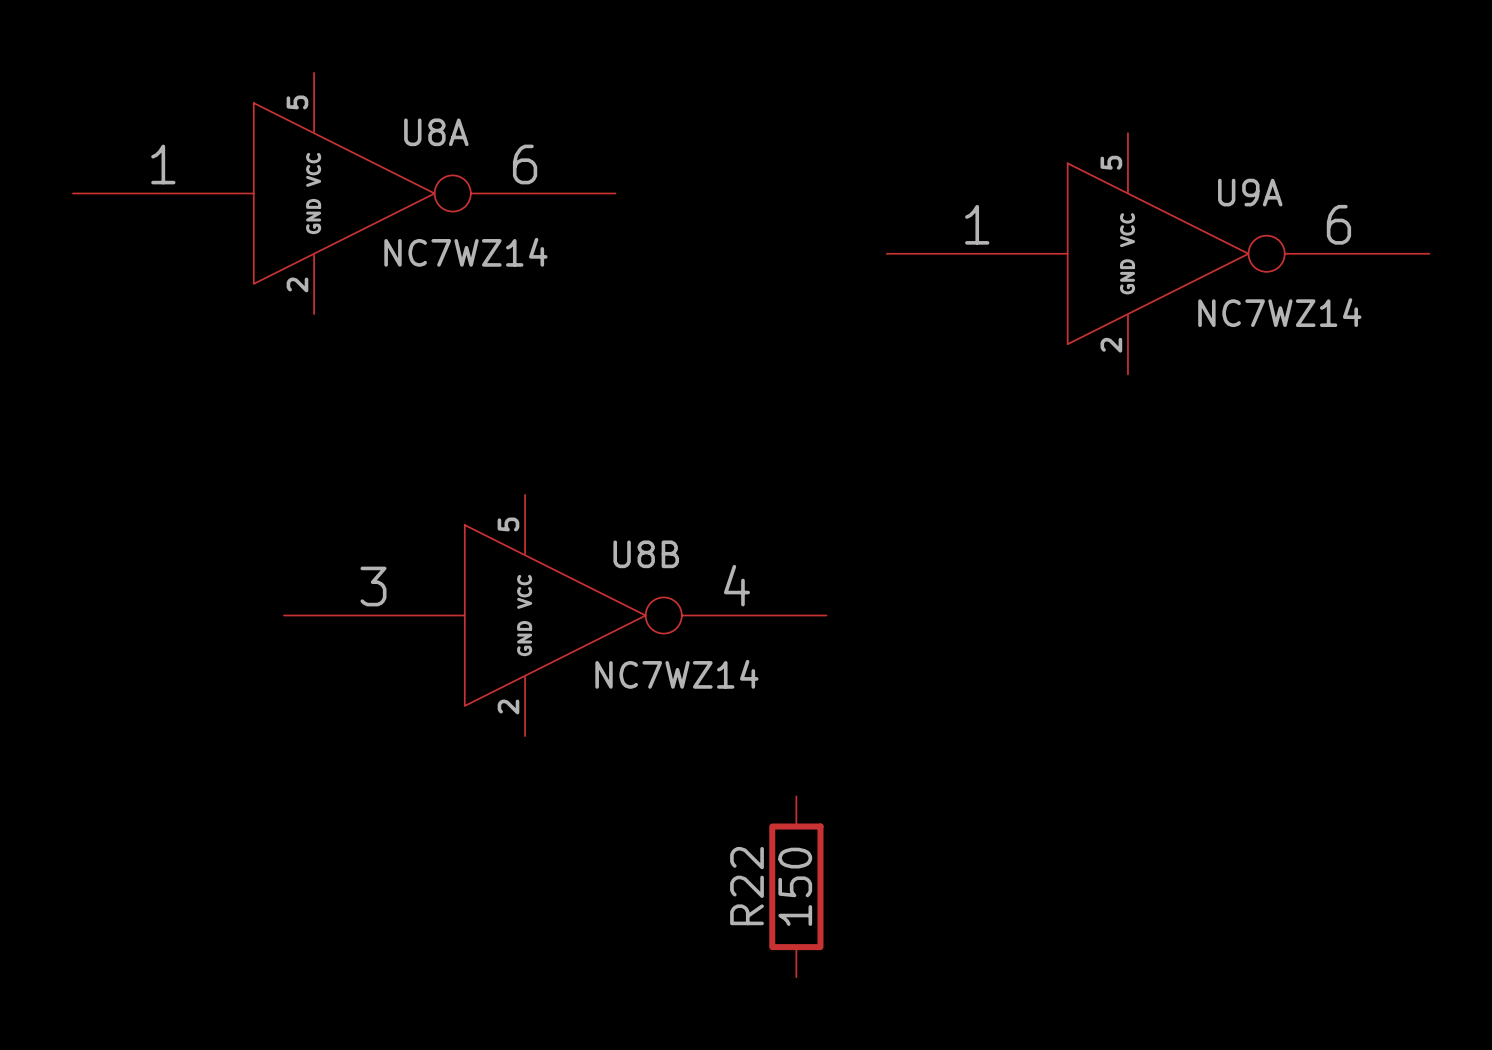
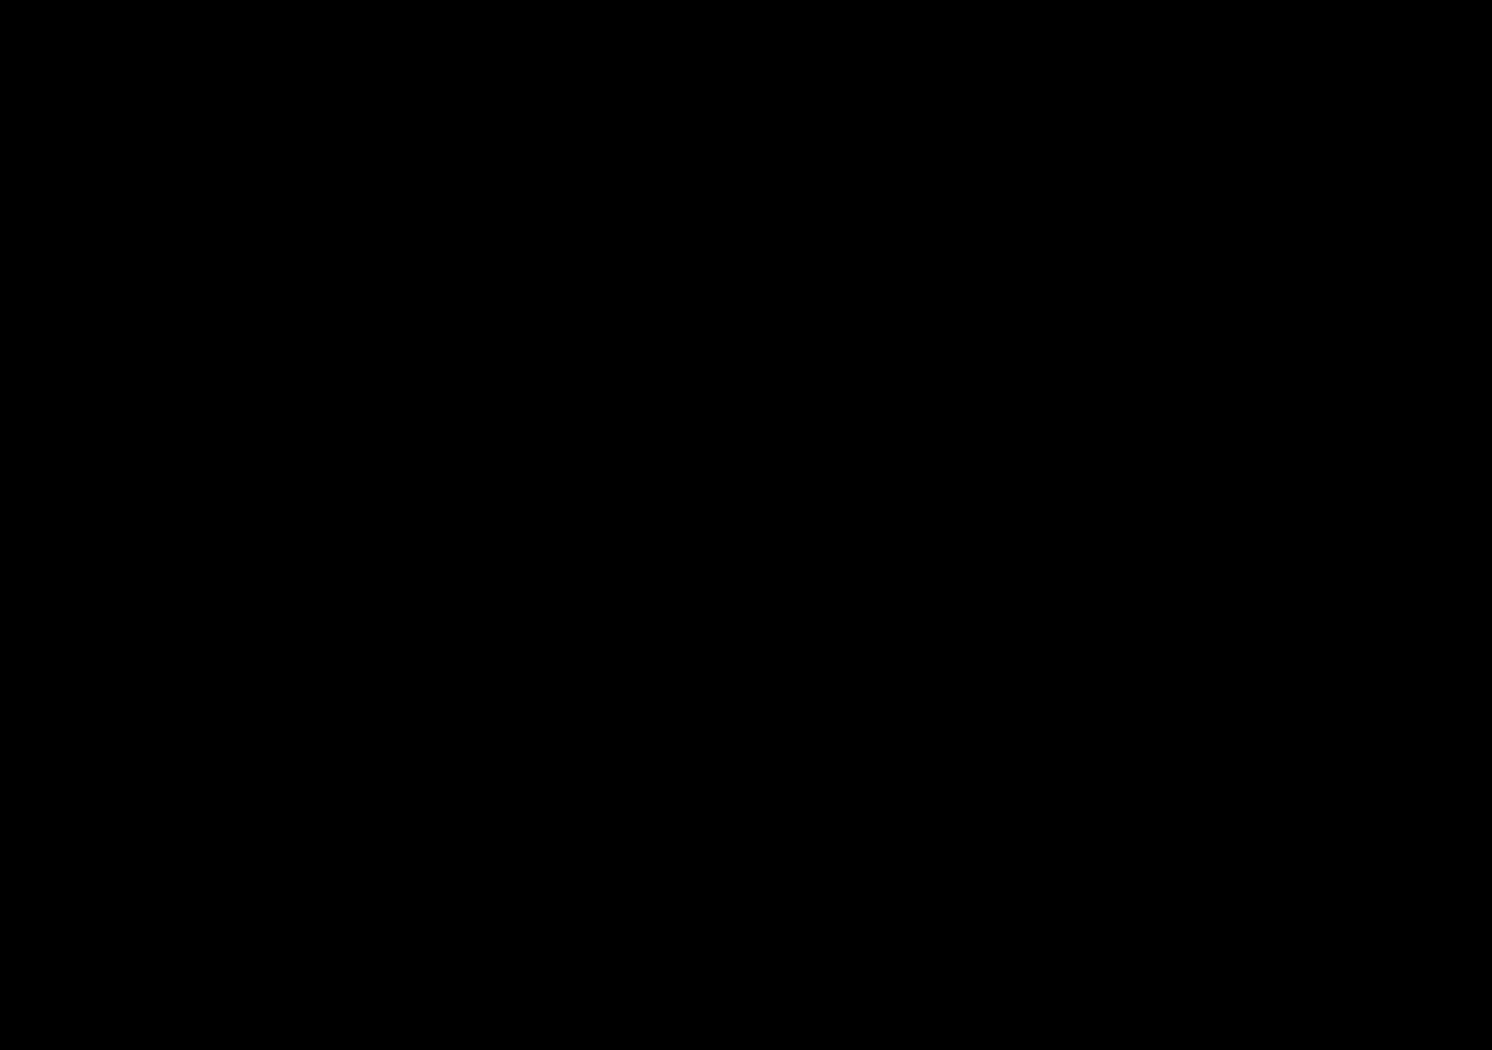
U8A: NC7WZ14 (344, 193) -> none
U9A: NC7WZ14 (1158, 253) -> none
U8B: NC7WZ14 (555, 615) -> none
R22: 150 (796, 886) -> none

